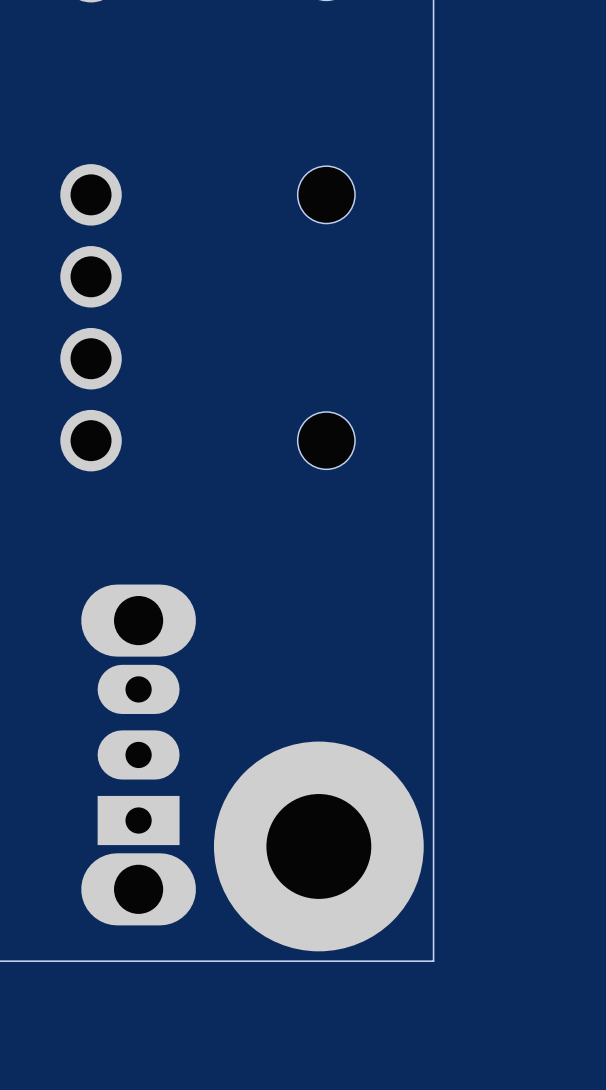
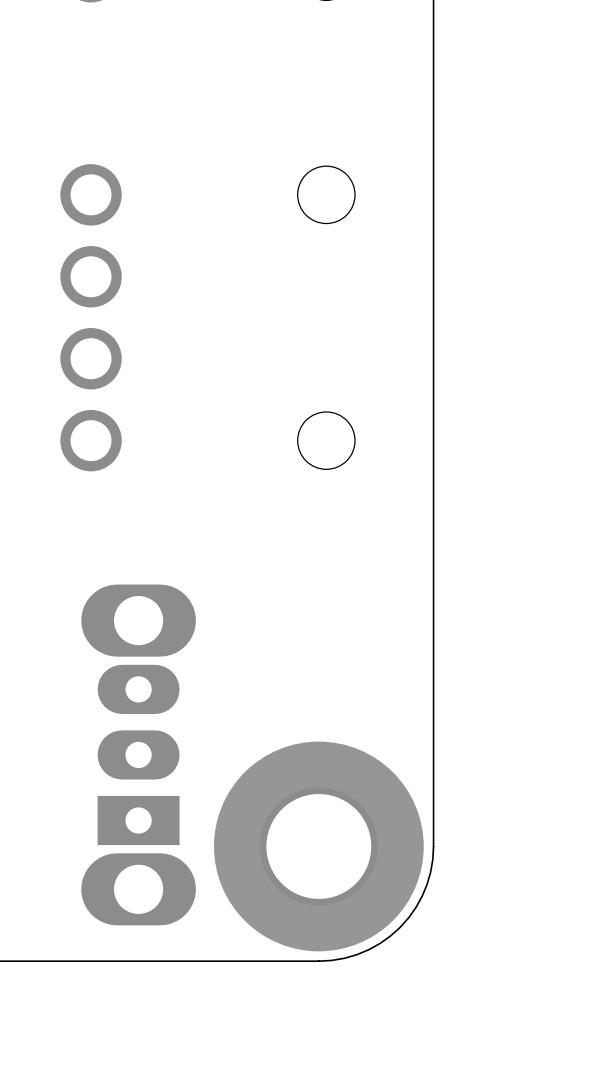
board edge: (433, 846) (433, 961) (318, 961) -> (433, 846) (427, 884) (415, 907) (399, 927) (379, 943) (356, 954) (318, 961)

